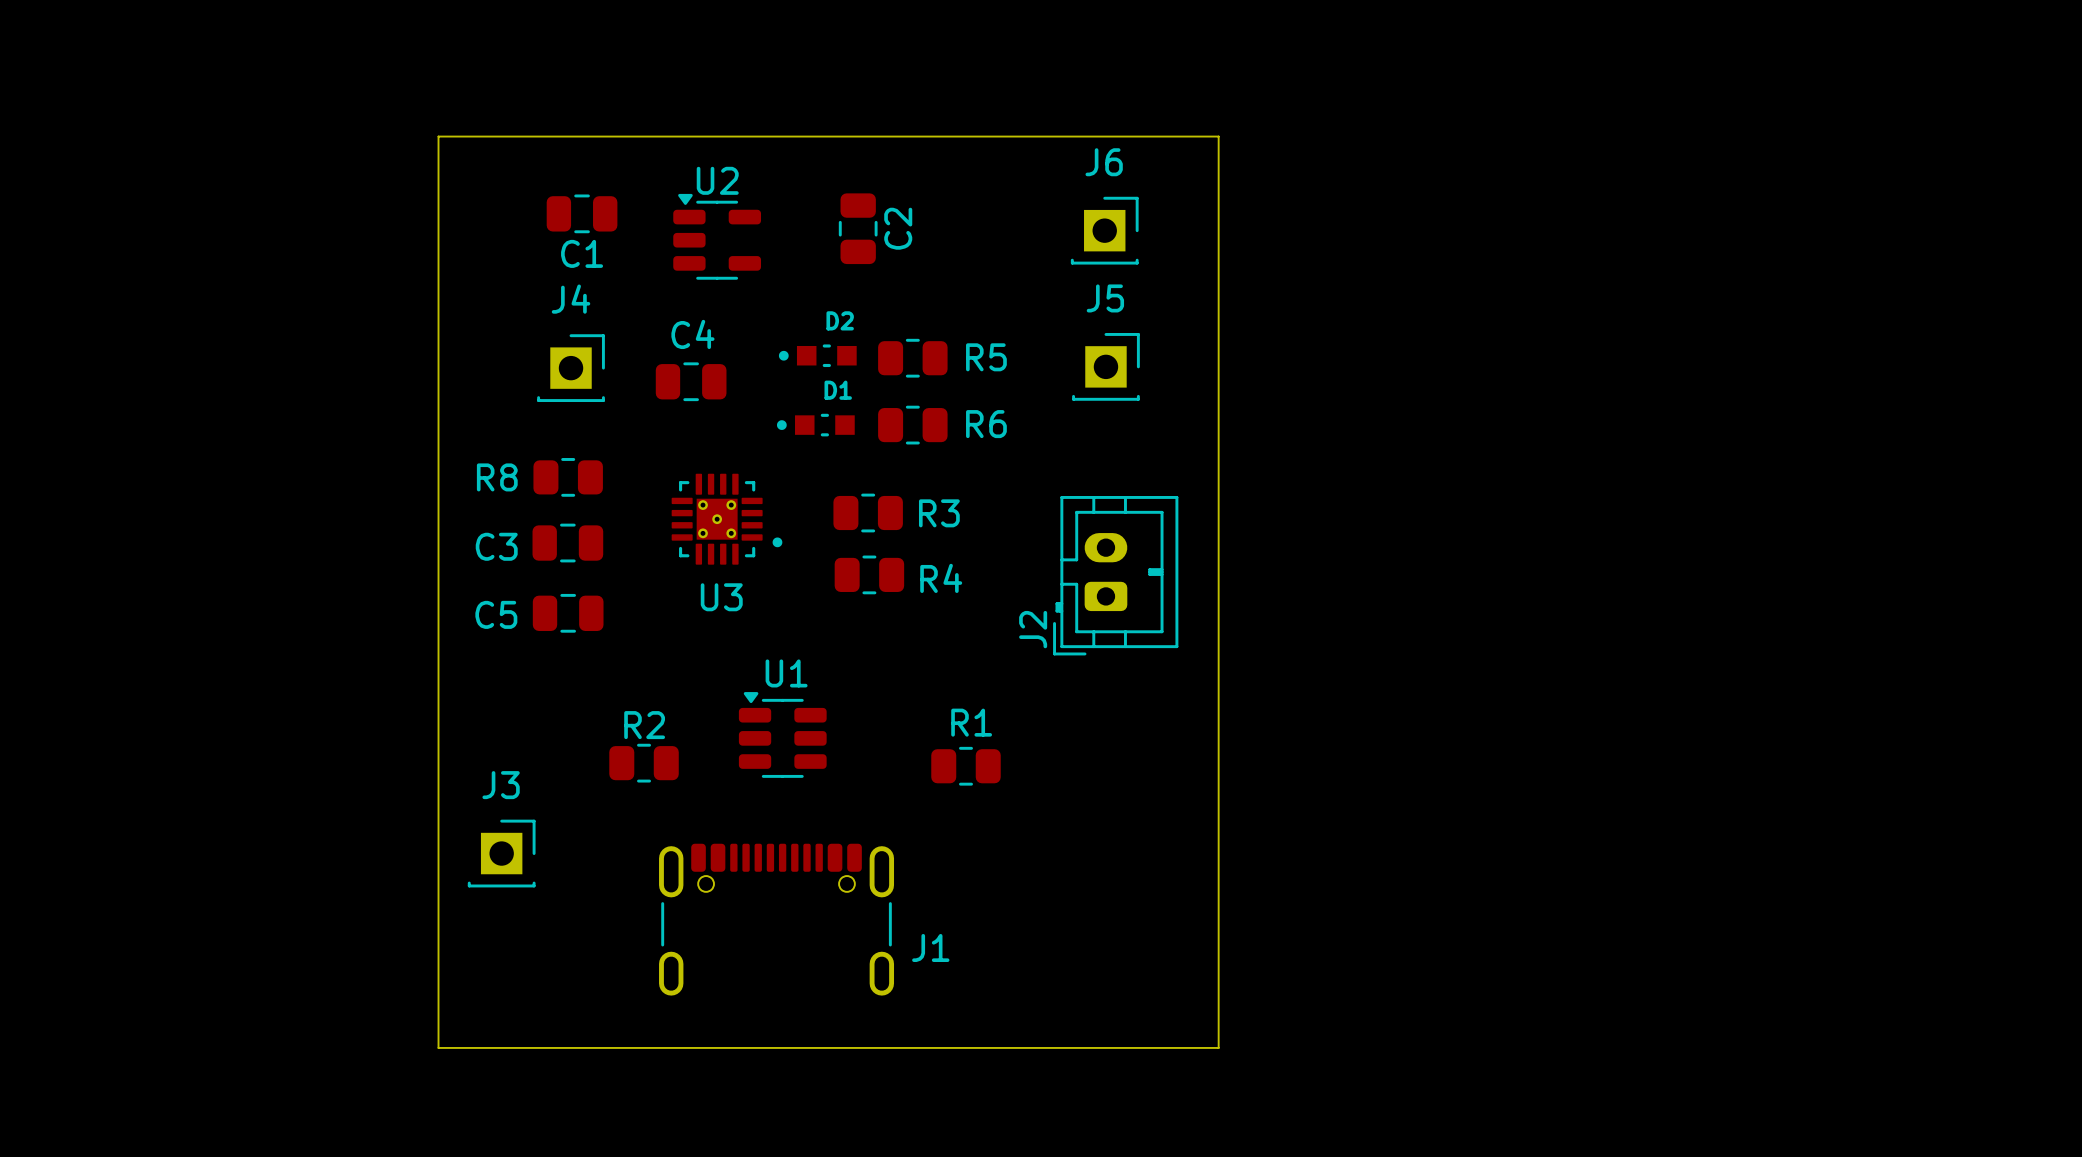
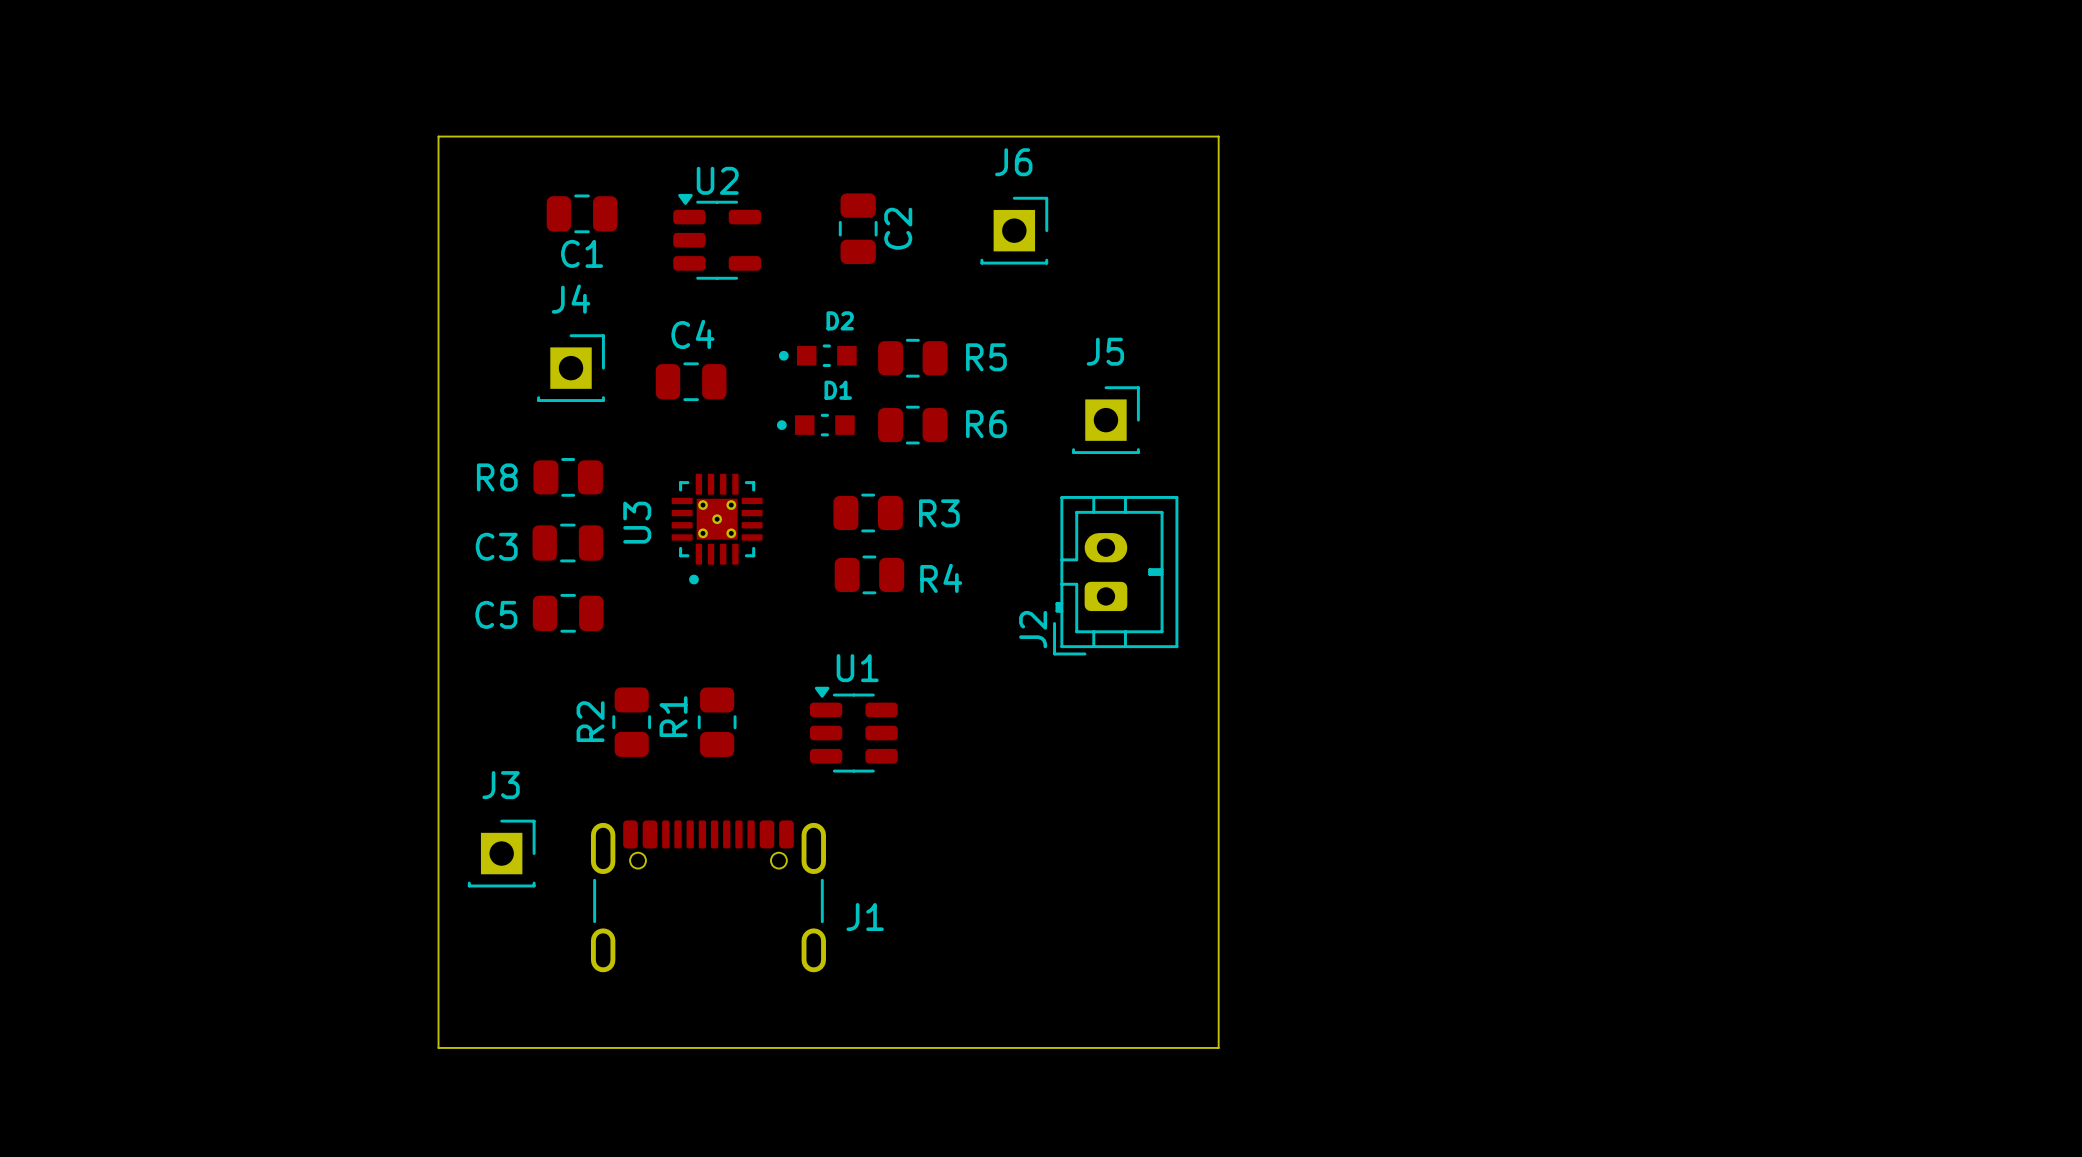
J6 position: (1104, 230) -> (1014, 230)
J5 position: (1105, 366) -> (1105, 420)
U3 rotation: 0° (727, 519) -> 90° clockwise (717, 529)
R1 name position: R1 (971, 722) -> R1 (673, 716)
R2 name position: R2 (644, 725) -> R2 (590, 721)
U1 position: (782, 734) -> (853, 729)
R2 rotation: 0° (644, 763) -> 90° clockwise (631, 722)
R2 position: (644, 763) -> (631, 722)
R1 rotation: 0° (965, 766) -> 90° clockwise (717, 722)
R1 position: (965, 766) -> (717, 722)
J1 position: (776, 919) -> (708, 896)
J1 name position: J1 (930, 947) -> J1 (865, 917)

